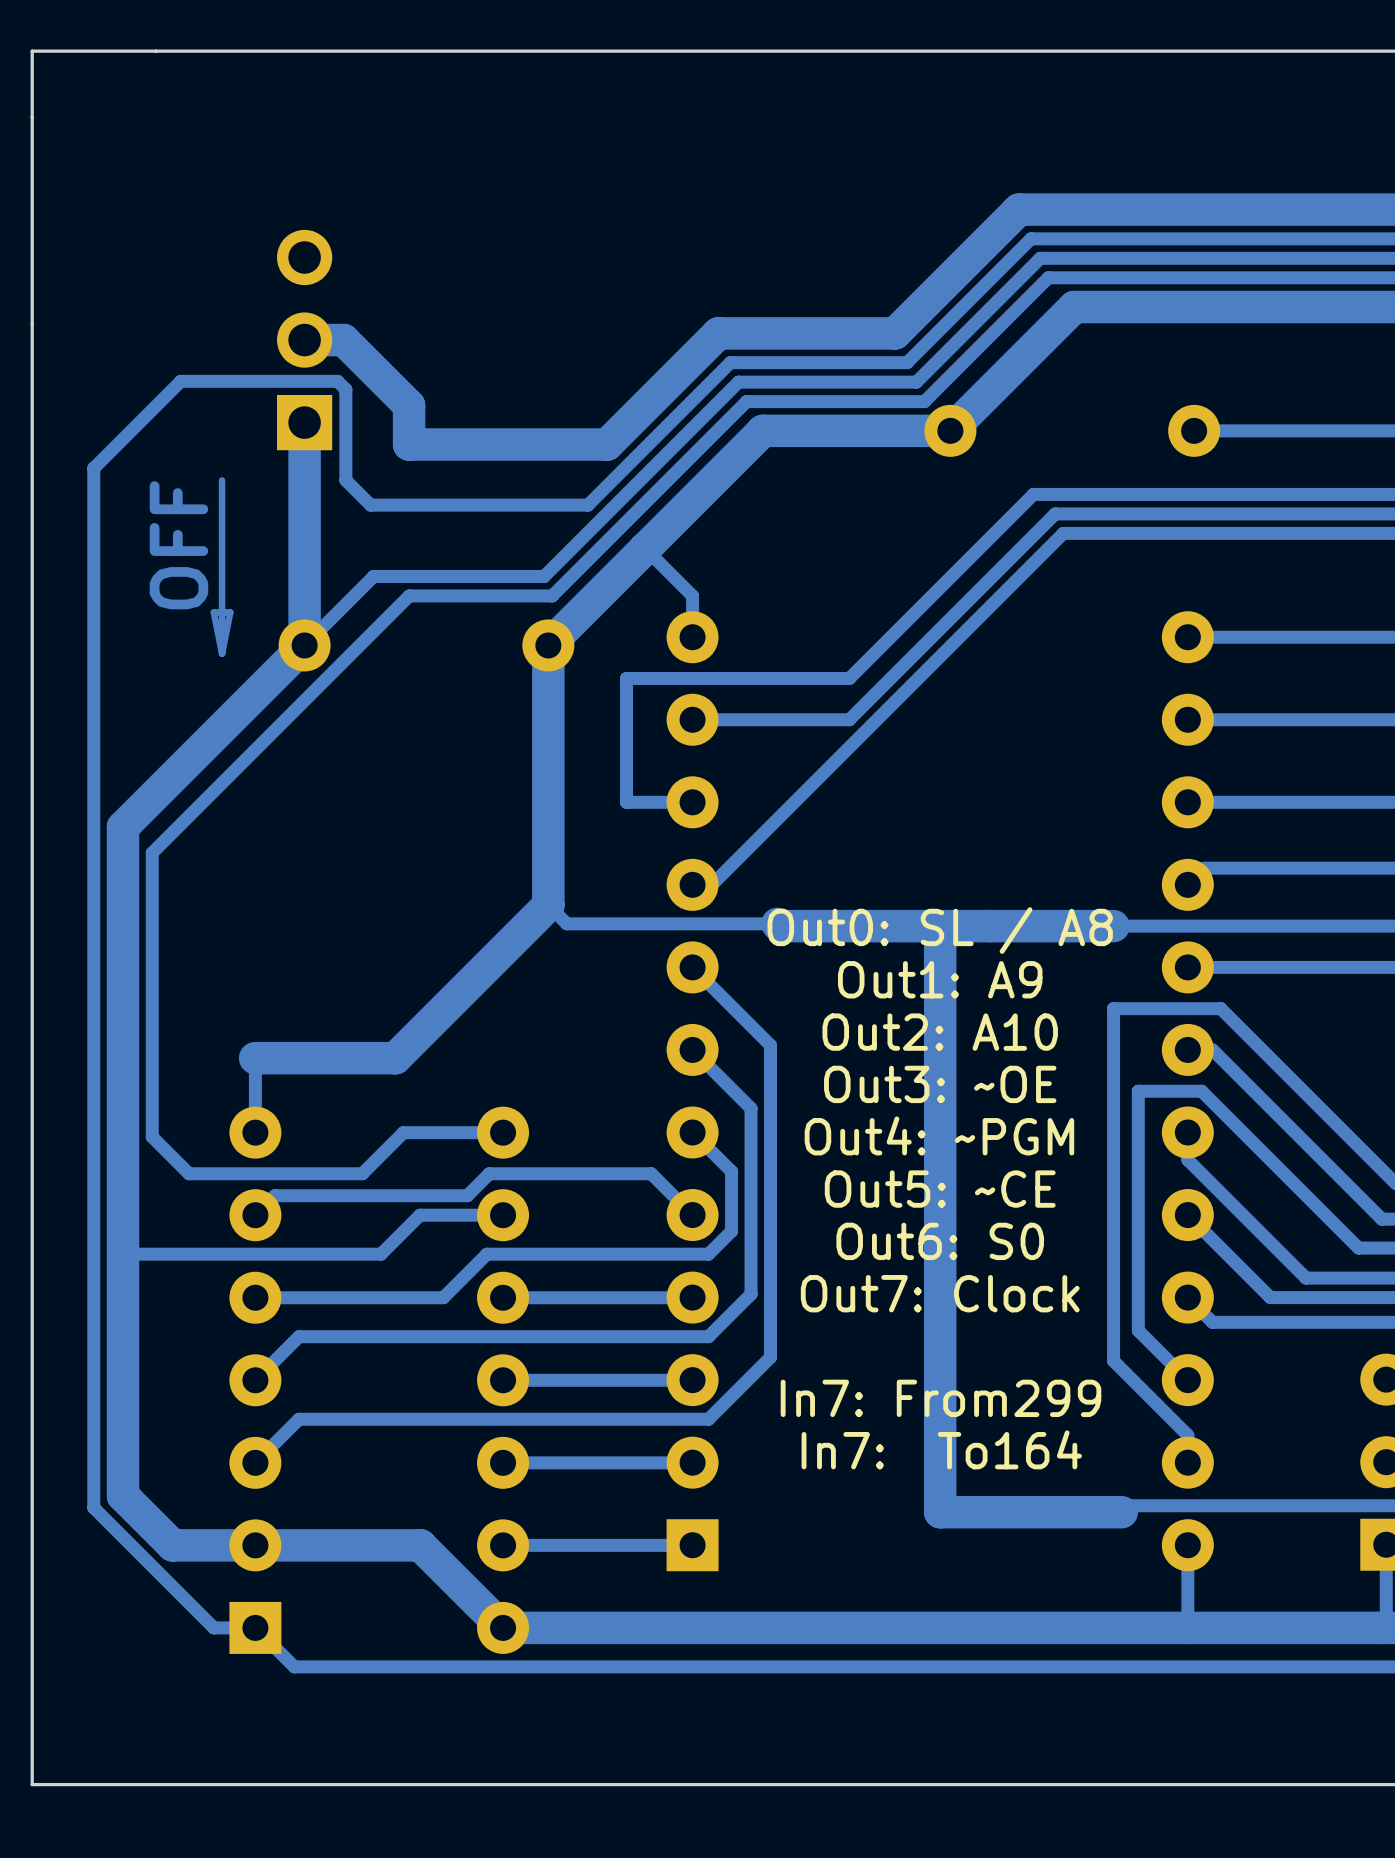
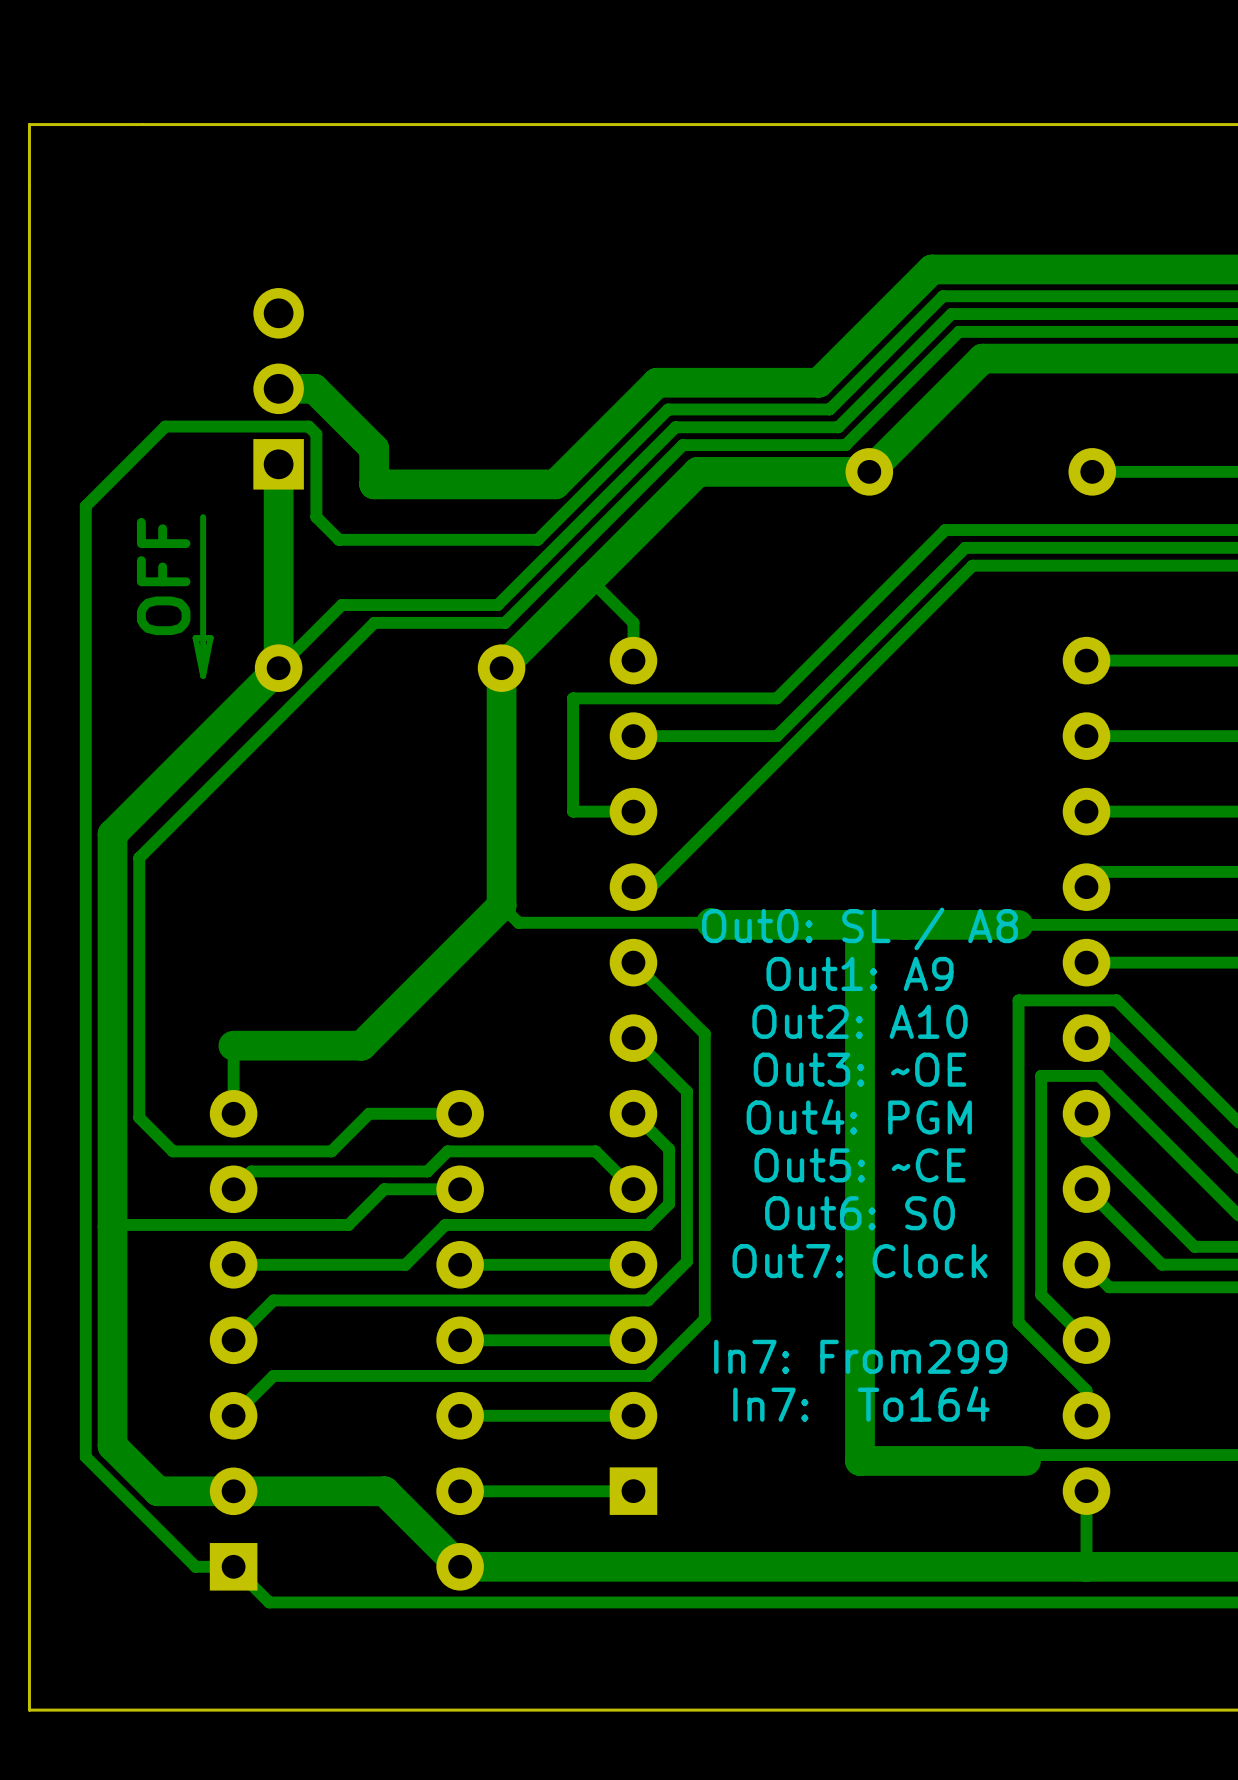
text: Out4: ~PGM (939, 1135) -> Out4: PGM (859, 1116)

